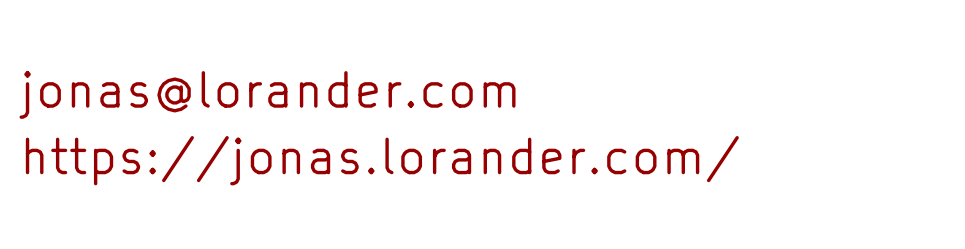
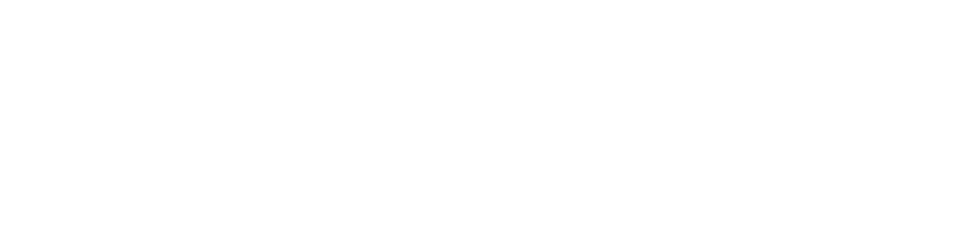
title block: jonas@lorander.com (267, 94) -> none
title block: https://jonas.lorander.com/ (382, 160) -> none

